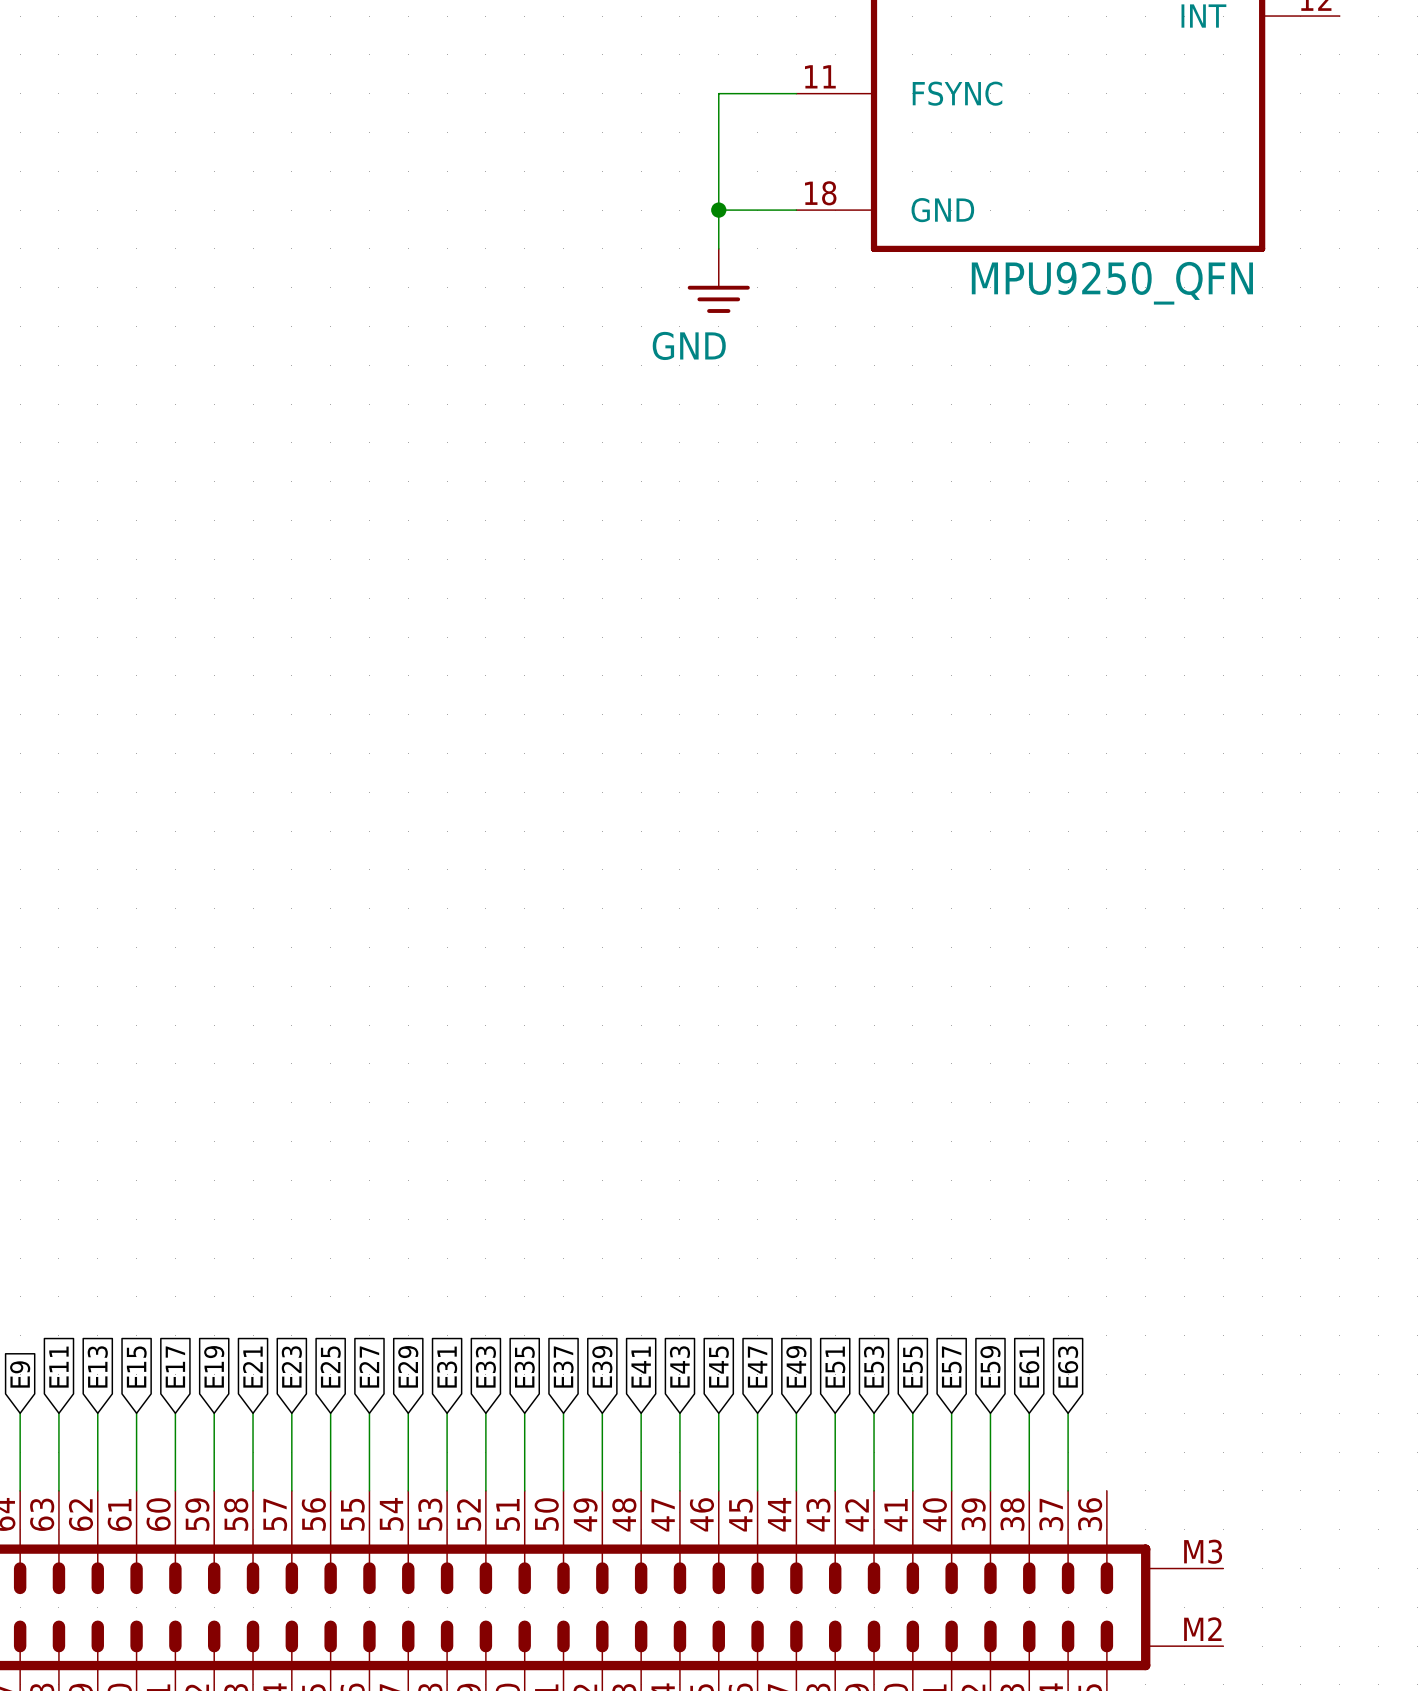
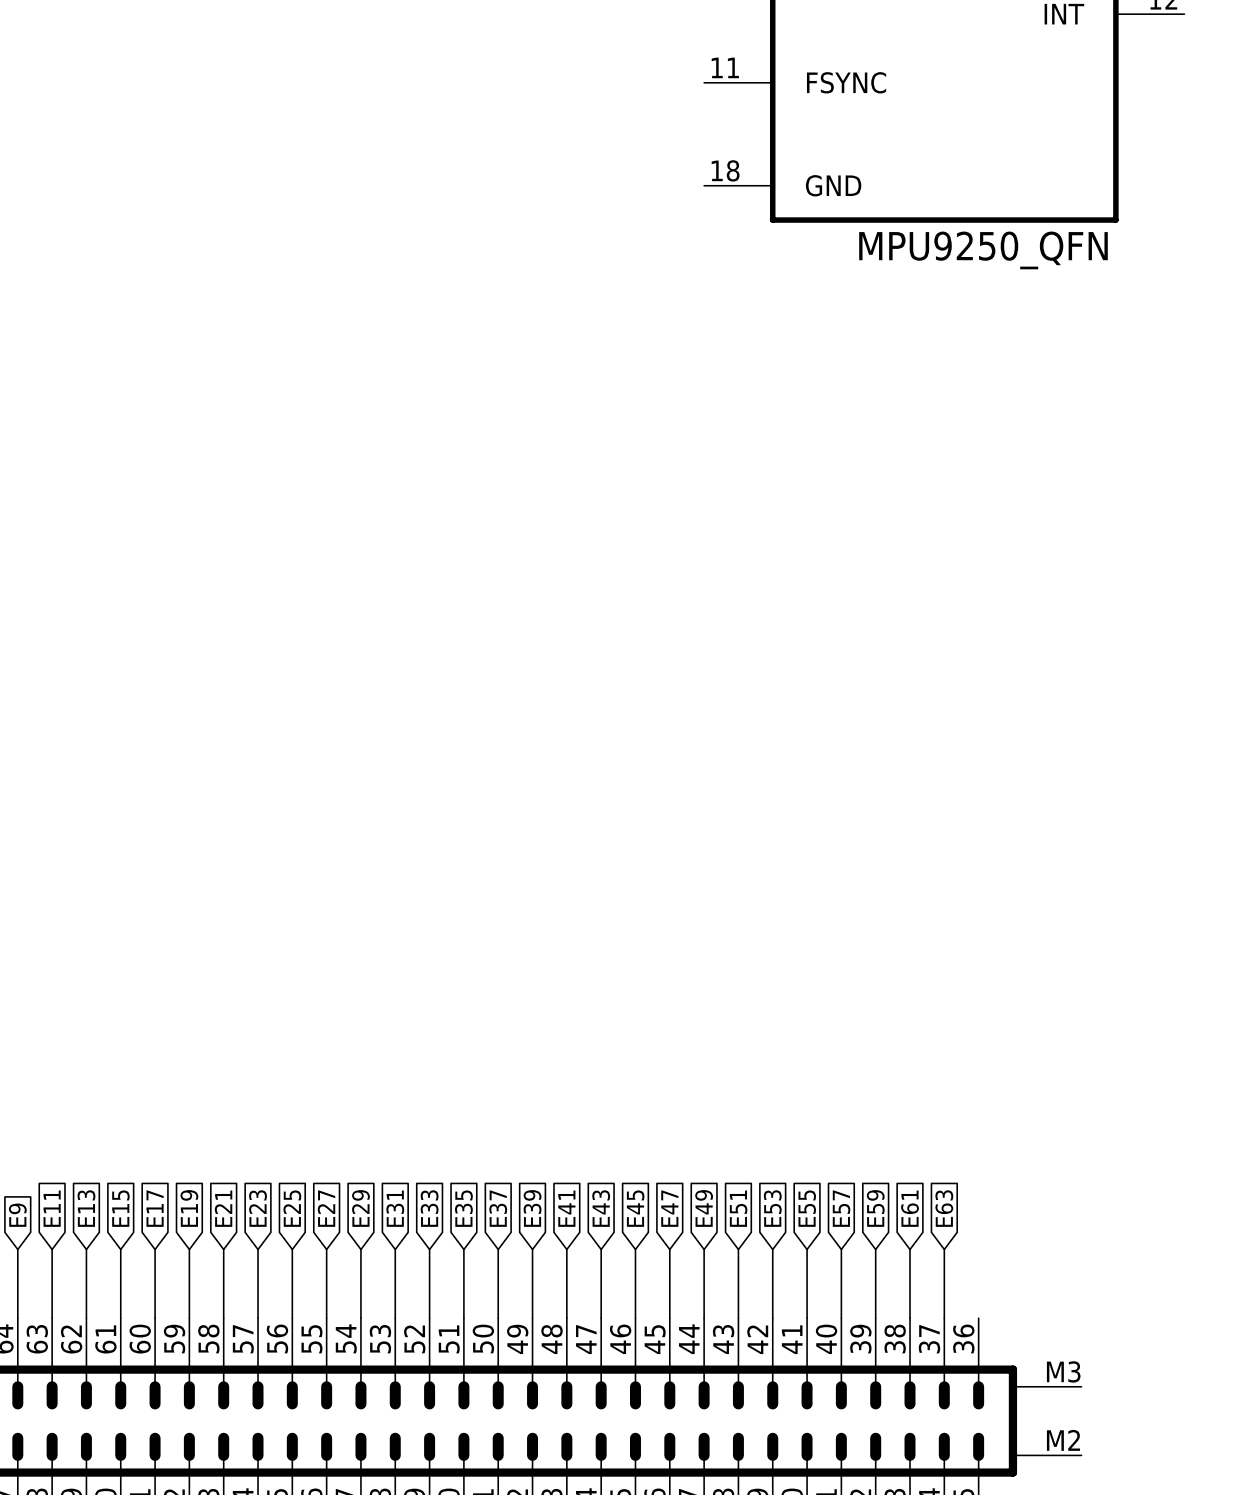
wire: (796, 93) (718, 93) (718, 248) -> none
wire: (718, 210) (796, 210) -> none
junction: (718, 210) -> none
power symbol: GND (718, 280) -> none

